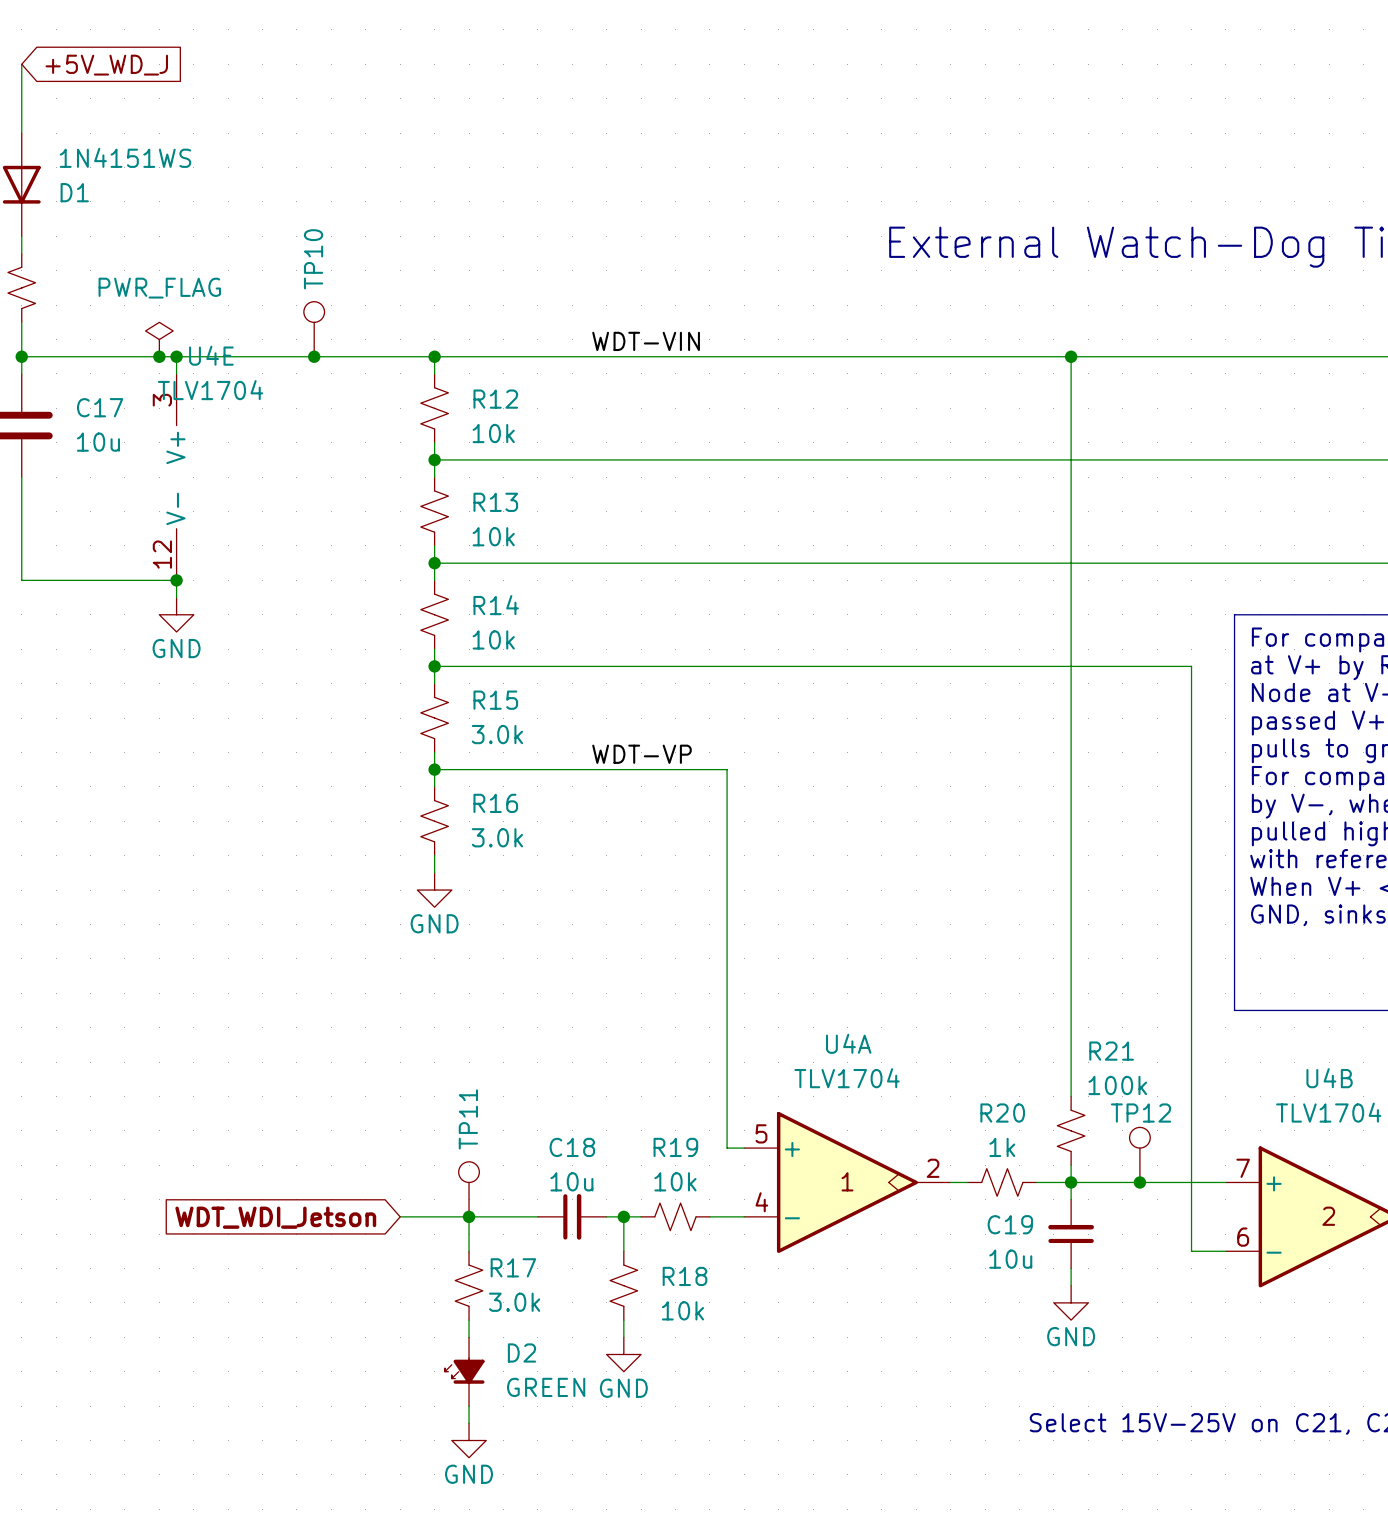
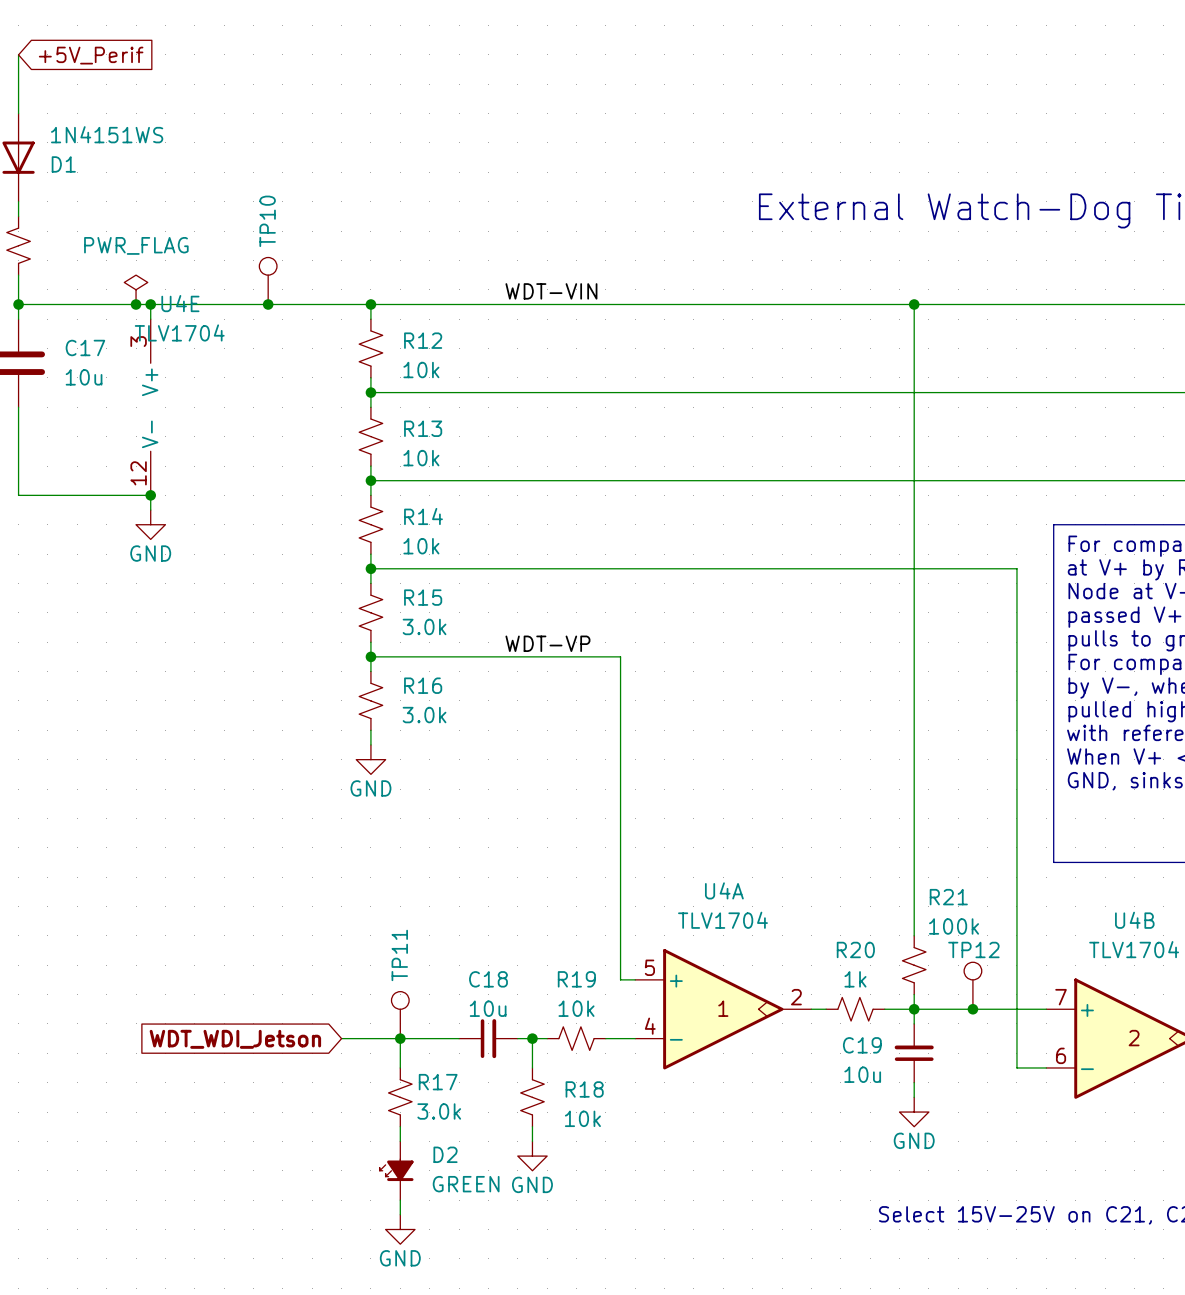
global label: +5V_WD_J (106, 65) -> +5V_Perif (91, 55)

